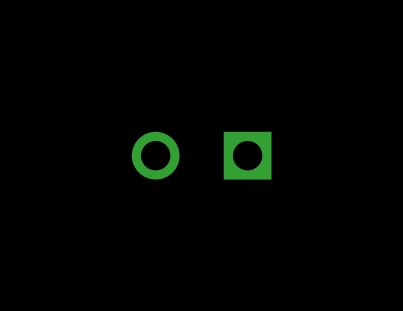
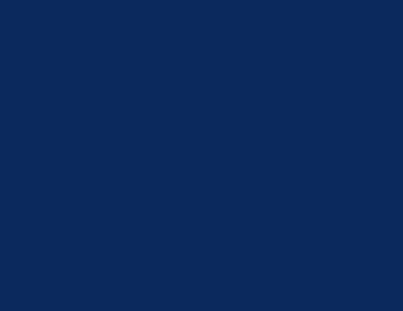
part: (201, 155) -> none

